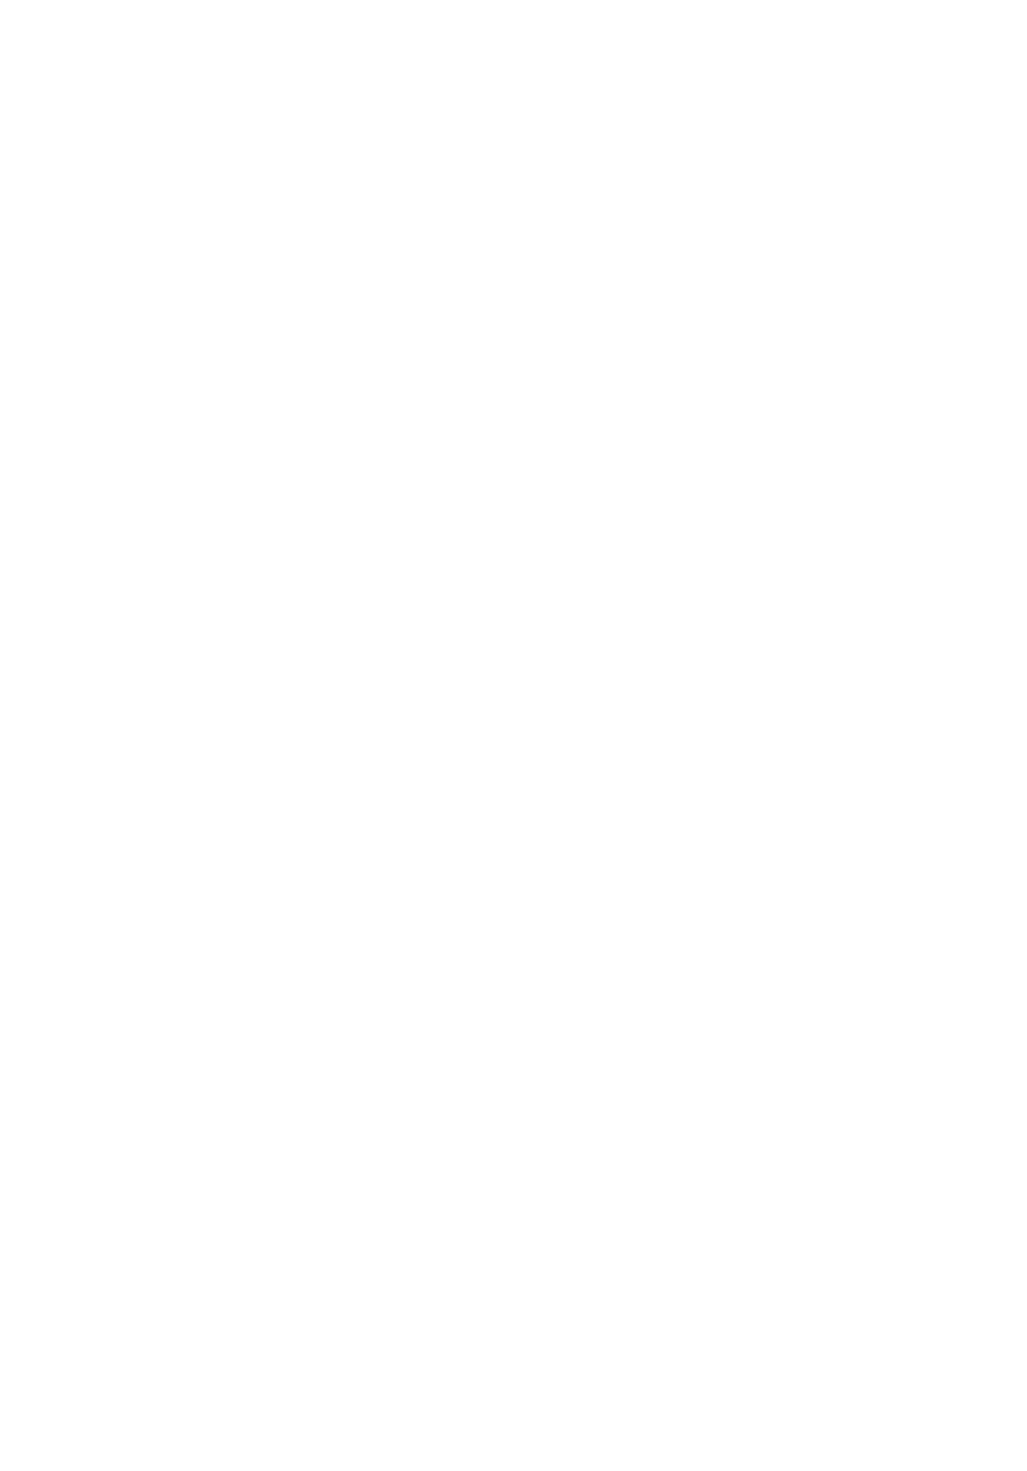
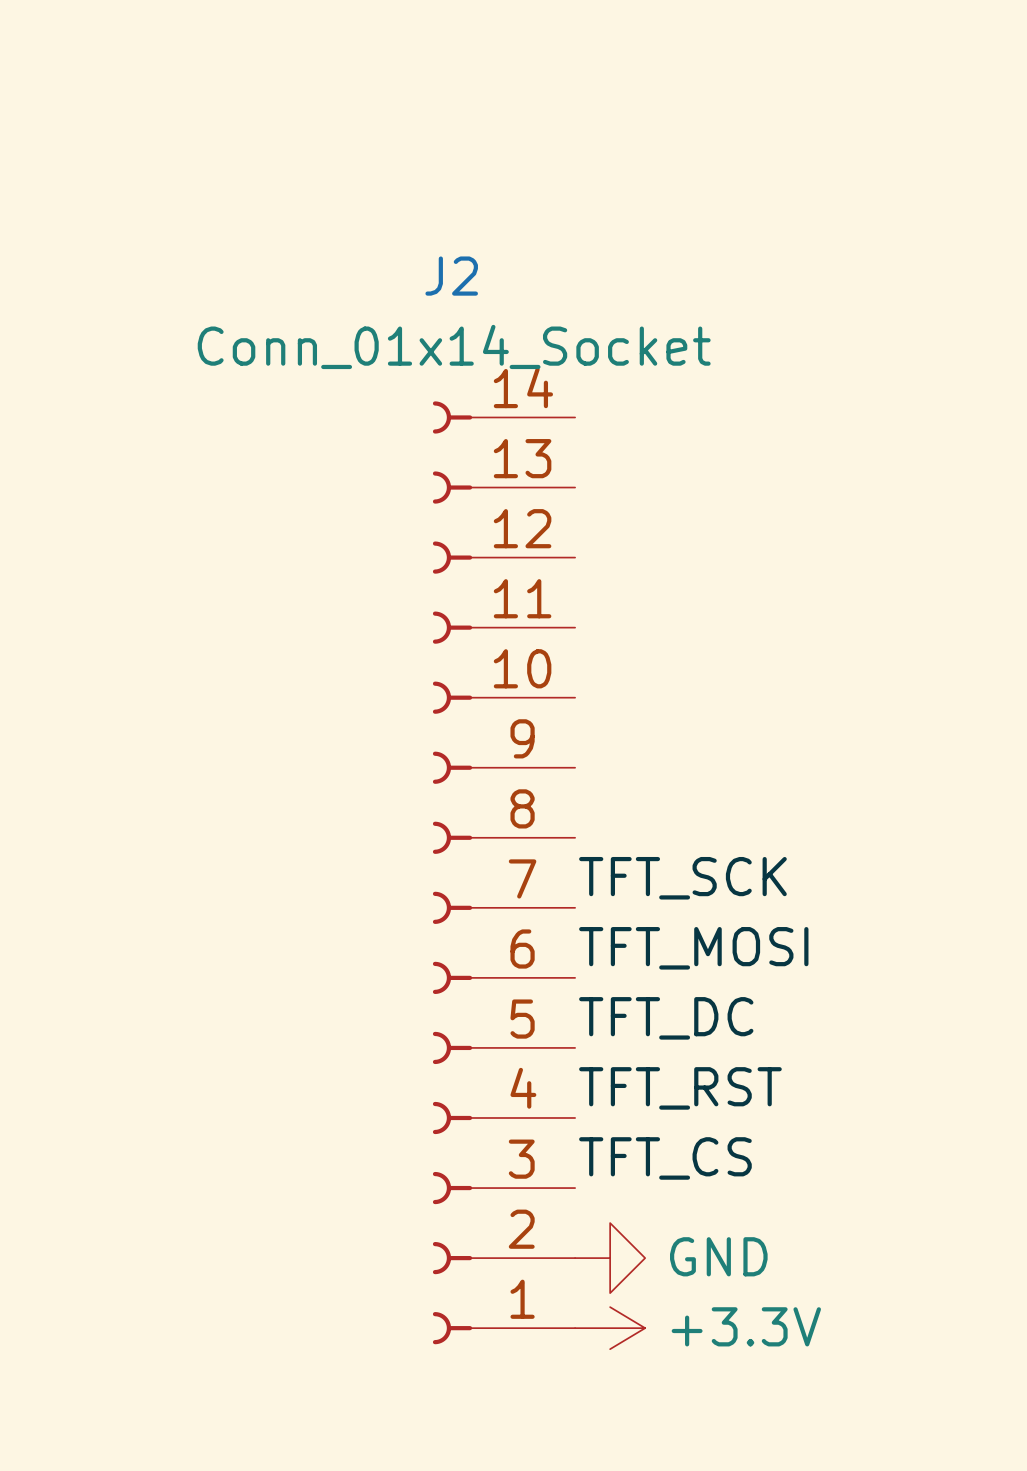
J2: none -> Conn_01x14_Socket (504, 872)
label: none -> TFT_SCK (682, 878)
label: none -> TFT_MOSI (693, 948)
label: none -> TFT_DC (666, 1018)
label: none -> TFT_RST (680, 1088)
label: none -> TFT_CS (665, 1158)
power symbol: none -> GND (610, 1258)
power symbol: none -> +3.3V (610, 1328)

